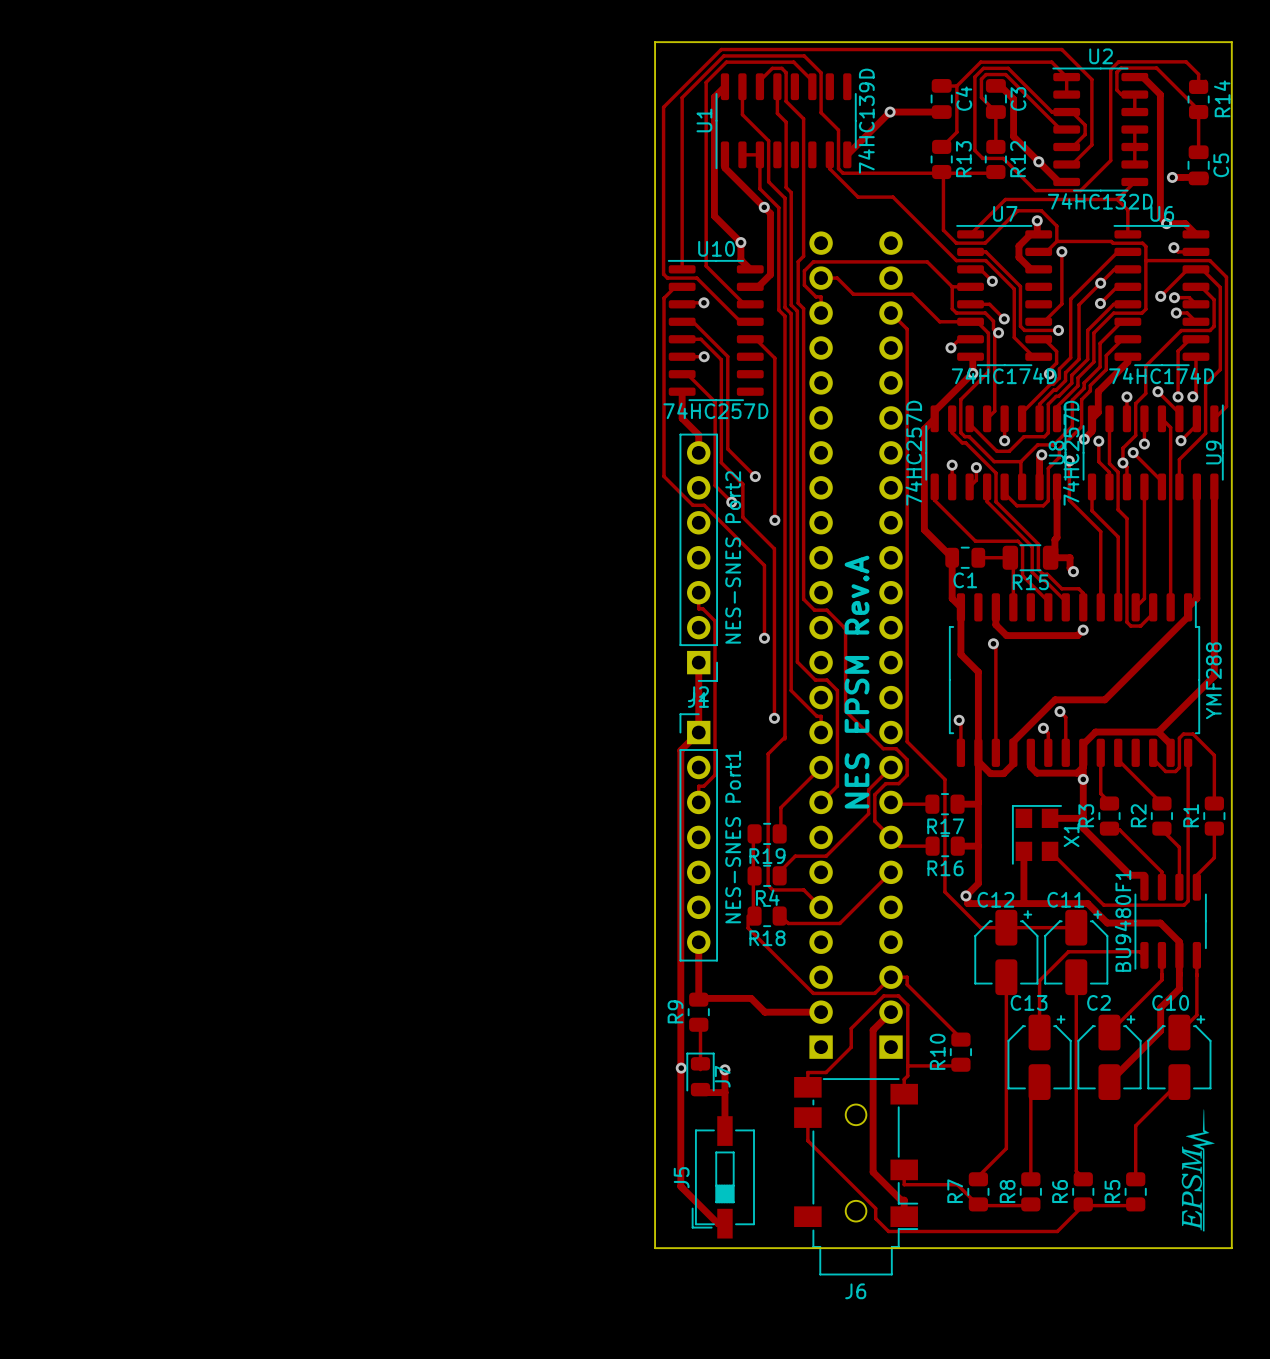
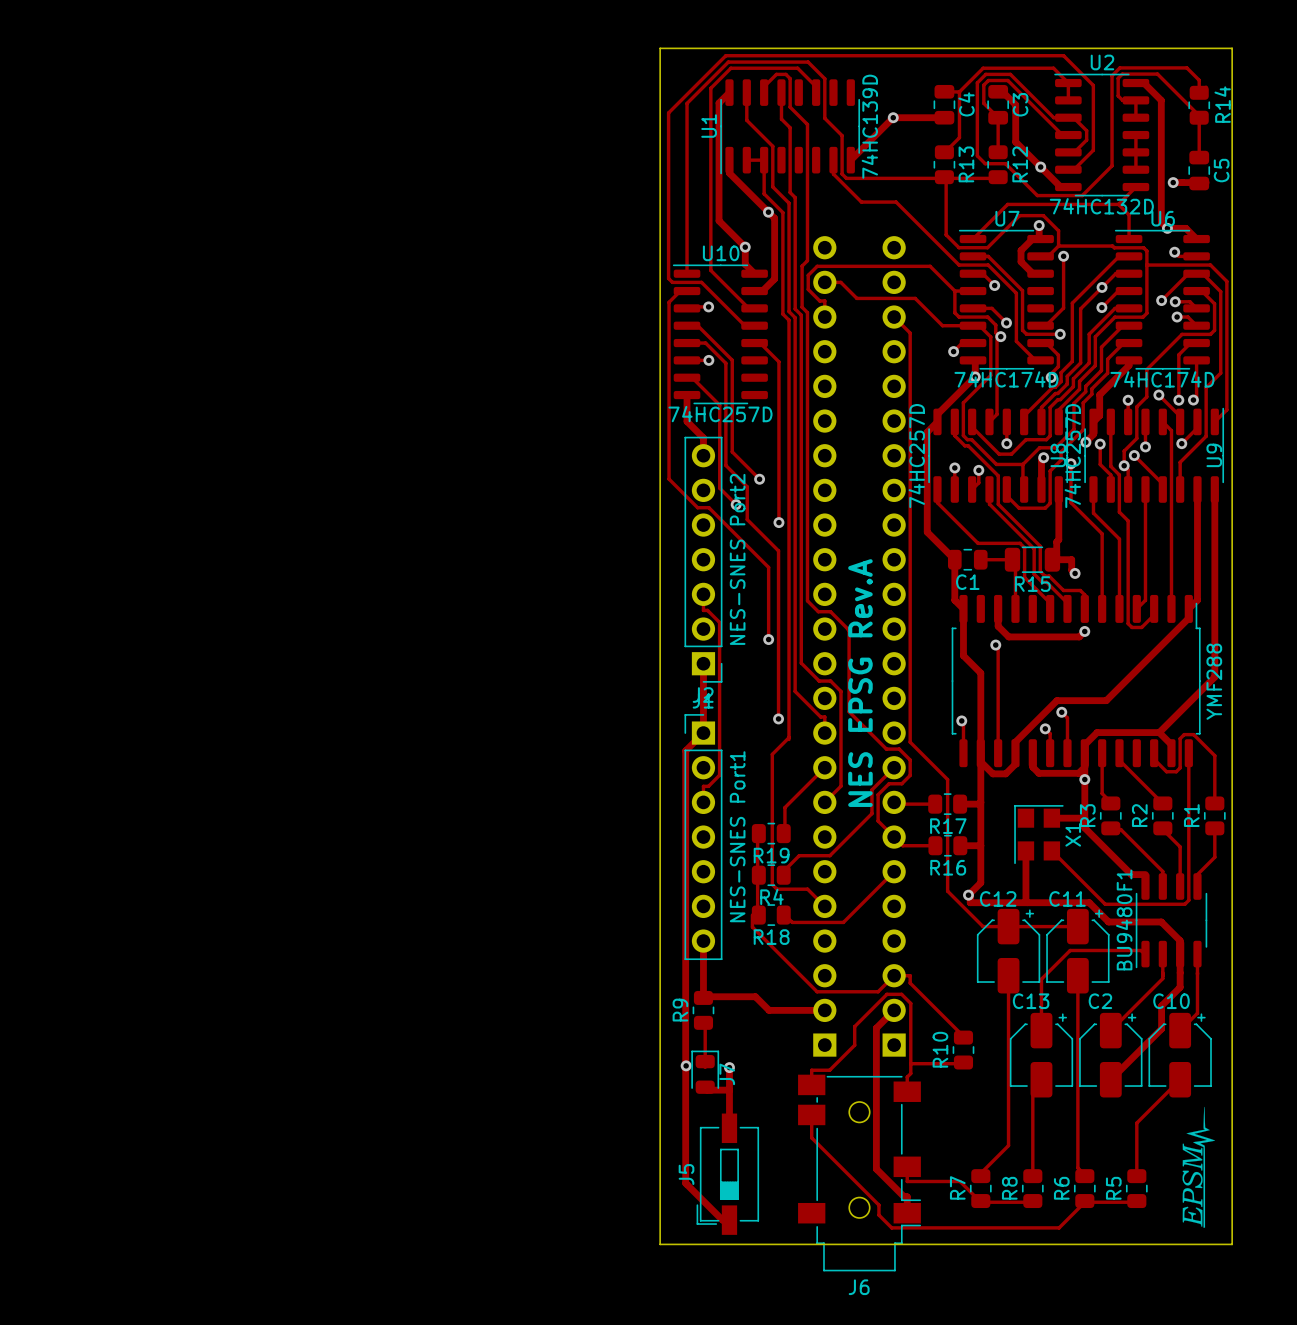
text: NES EPSM Rev.A (857, 682) -> NES EPSG Rev.A (860, 683)

